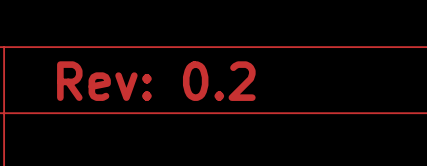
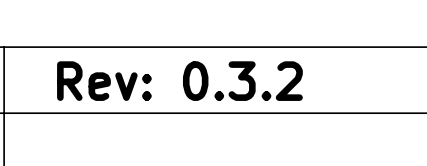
title block: Rev: 0.2 (156, 81) -> Rev: 0.3.2 (179, 81)

